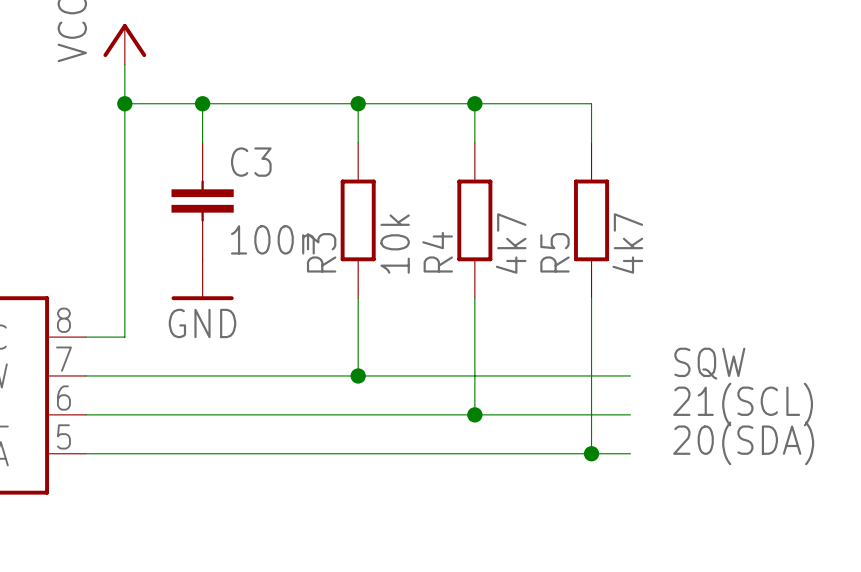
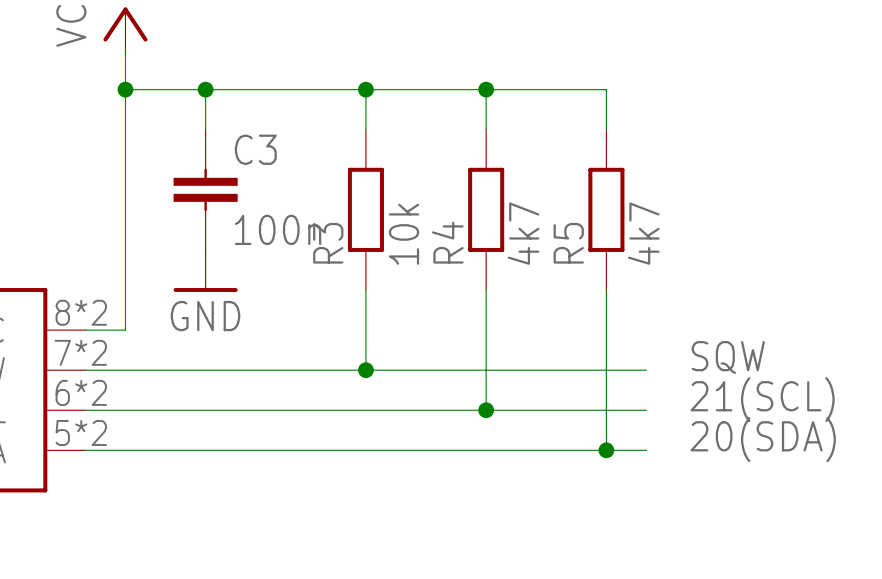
part pin number: 8 (63, 320) -> 8*2 (81, 312)
part pin number: 7 (63, 359) -> 7*2 (80, 352)
part pin number: 6 (63, 398) -> 6*2 (81, 392)
part pin number: 5 (63, 436) -> 5*2 (81, 432)

